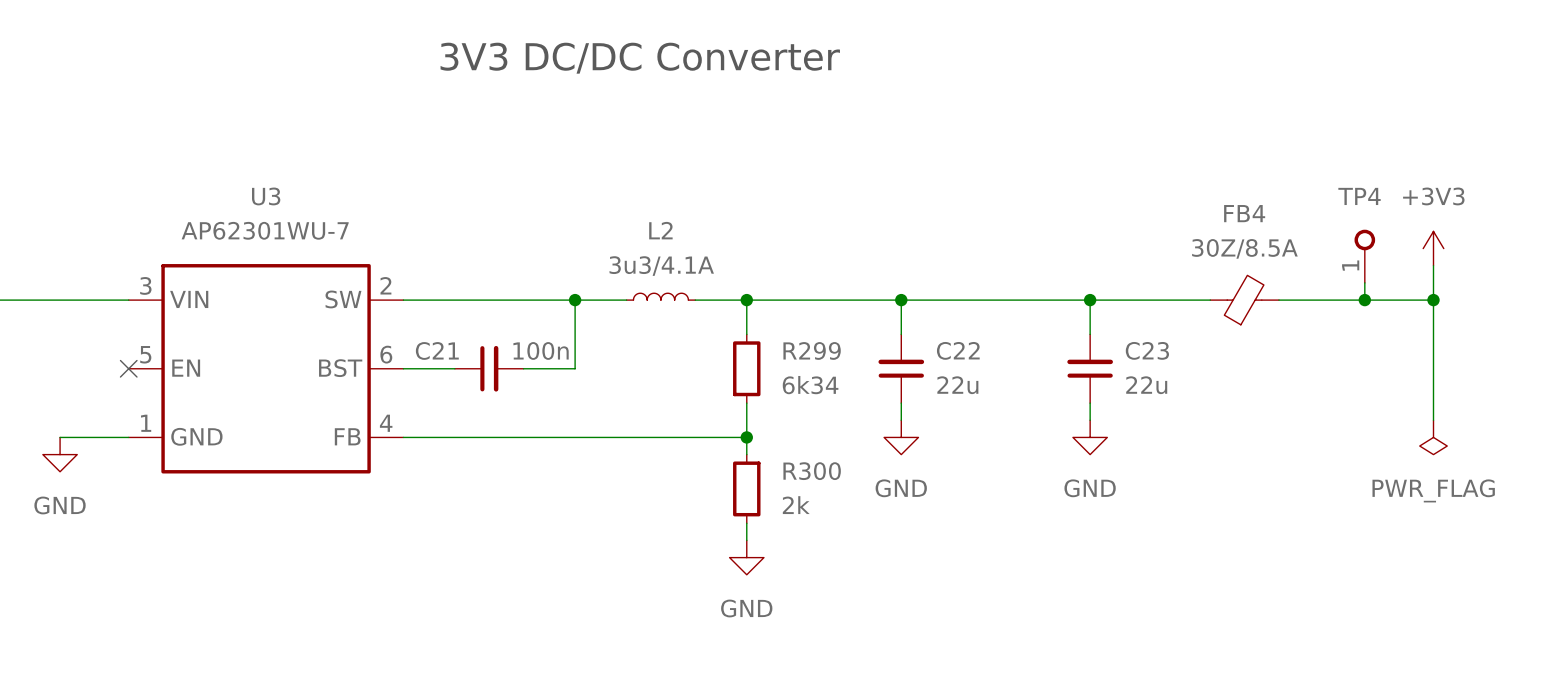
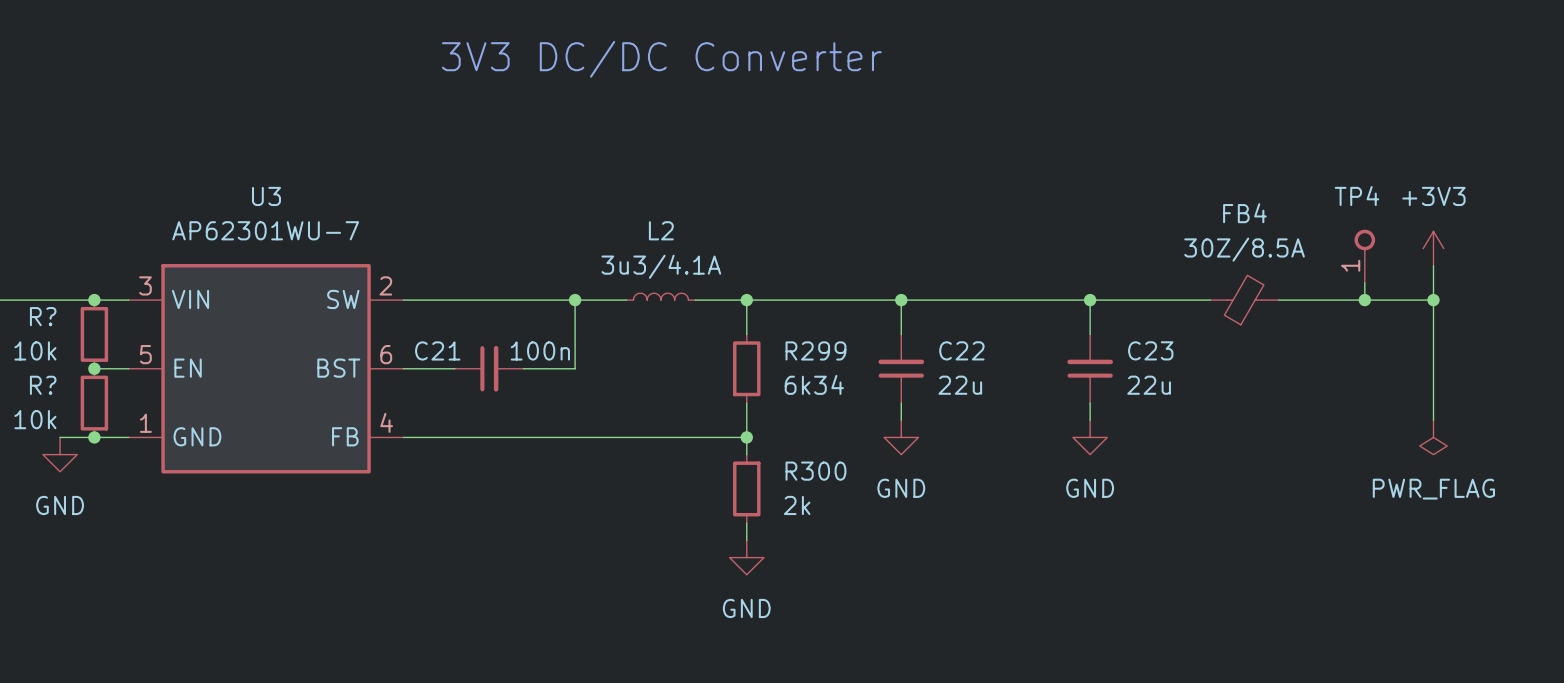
junction: none -> (94, 300)
R?: none -> (94, 334)
wire: none -> (94, 368) (128, 368)
junction: none -> (94, 368)
no-connect mark: (128, 368) -> none
R?: none -> (94, 403)
junction: none -> (94, 437)

